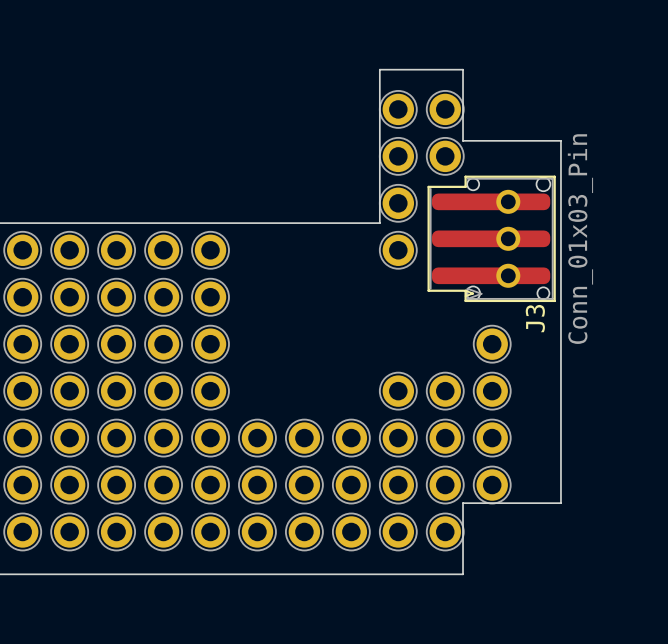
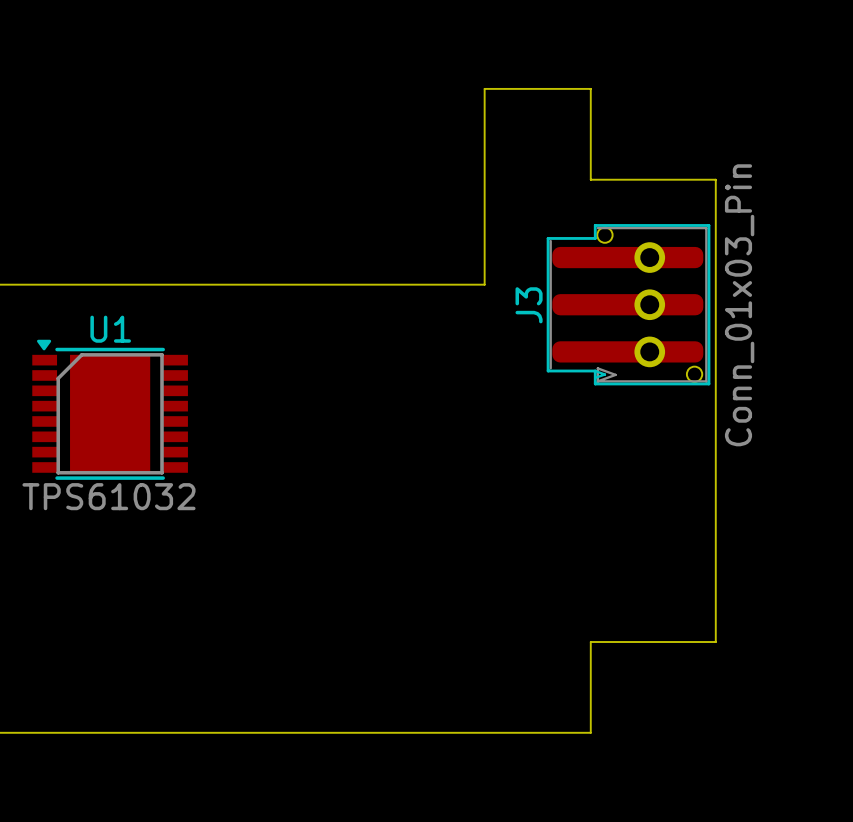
part: (398, 109) -> none
part: (445, 109) -> none
part: (398, 156) -> none
part: (445, 156) -> none
J3 footprint: [427, 175, 556, 303] -> [546, 224, 711, 386]
part: (398, 203) -> none
part: (22, 250) -> none
part: (69, 250) -> none
part: (116, 250) -> none
part: (163, 250) -> none
part: (210, 250) -> none
part: (398, 250) -> none
part: (22, 297) -> none
part: (69, 297) -> none
part: (116, 297) -> none
part: (163, 297) -> none
part: (210, 297) -> none
J3 name position: J3 (535, 318) -> J3 (529, 305)
U1: none -> TPS61032 (110, 409)
part: (22, 344) -> none
part: (69, 344) -> none
part: (116, 344) -> none
part: (163, 344) -> none
part: (210, 344) -> none
part: (492, 344) -> none
part: (22, 391) -> none
part: (69, 391) -> none
part: (116, 391) -> none
part: (163, 391) -> none
part: (210, 391) -> none
part: (398, 391) -> none
part: (445, 391) -> none
part: (492, 391) -> none
part: (22, 438) -> none
part: (69, 438) -> none
part: (116, 438) -> none
part: (163, 438) -> none
part: (210, 438) -> none
part: (257, 438) -> none
part: (304, 438) -> none
part: (351, 438) -> none
part: (398, 438) -> none
part: (445, 438) -> none
part: (492, 438) -> none
part: (22, 485) -> none
part: (69, 485) -> none
part: (116, 485) -> none
part: (163, 485) -> none
part: (210, 485) -> none
part: (257, 485) -> none
part: (304, 485) -> none
part: (351, 485) -> none
part: (398, 485) -> none
part: (445, 485) -> none
part: (492, 485) -> none
part: (22, 531) -> none
part: (69, 531) -> none
part: (116, 531) -> none
part: (163, 531) -> none
part: (210, 531) -> none
part: (257, 531) -> none
part: (304, 531) -> none
part: (351, 531) -> none
part: (398, 531) -> none
part: (445, 531) -> none

